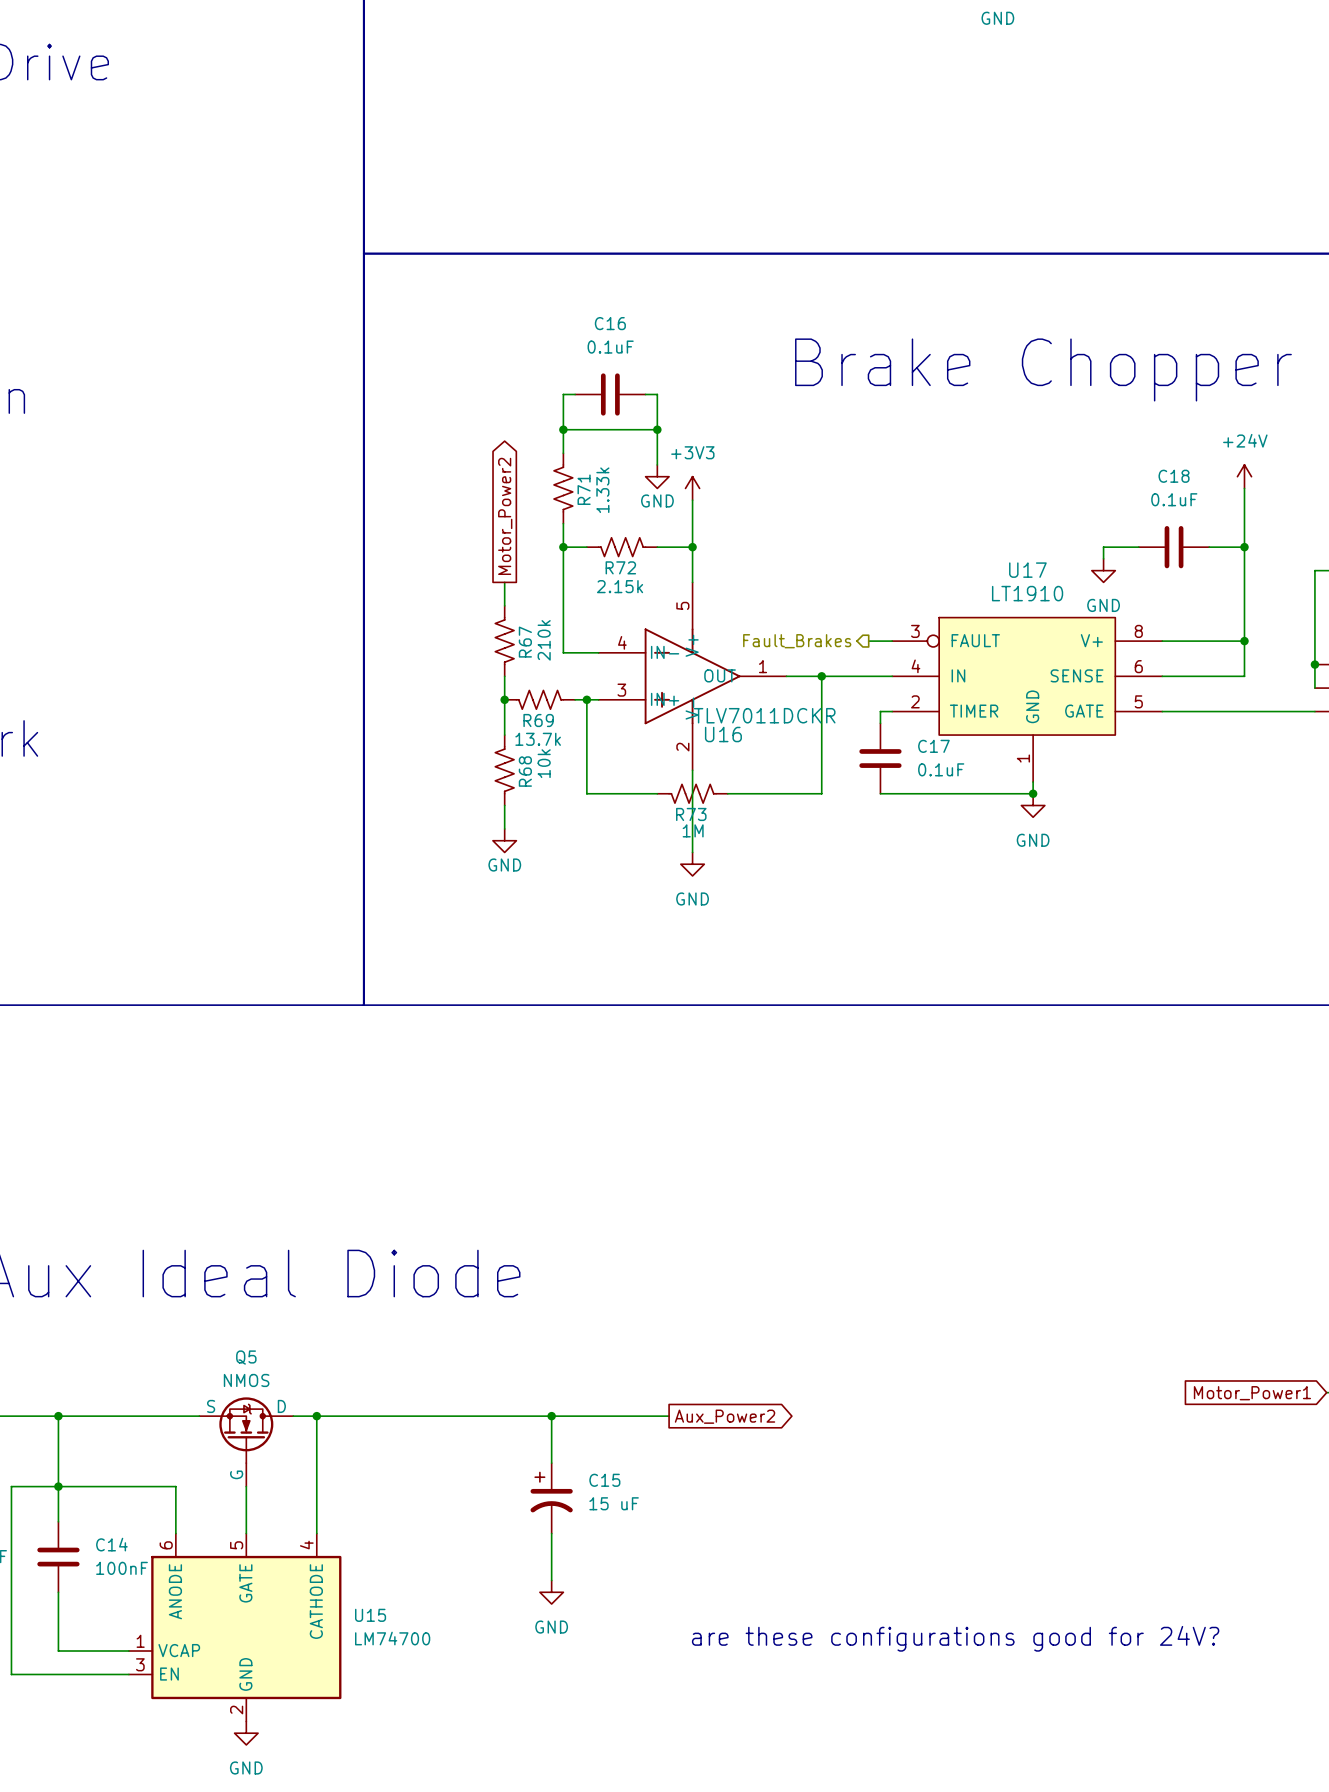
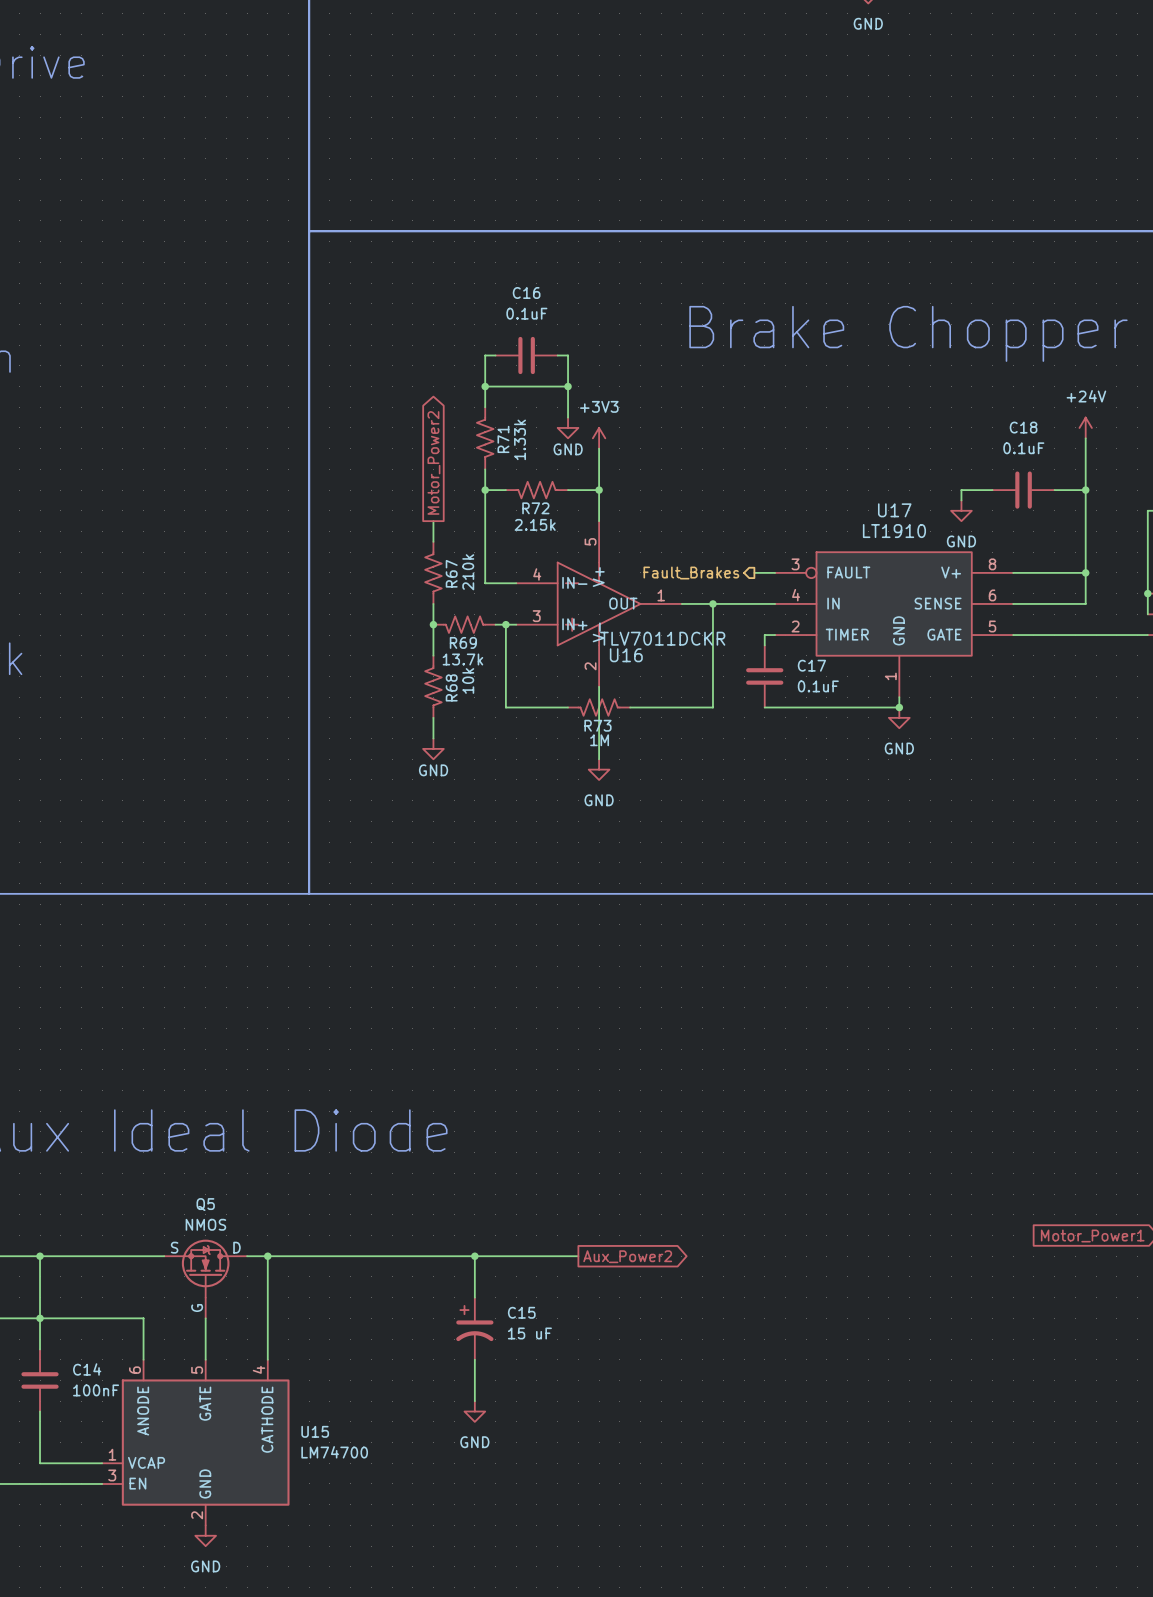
text: are these configurations good for 24V? (955, 1638) -> none

